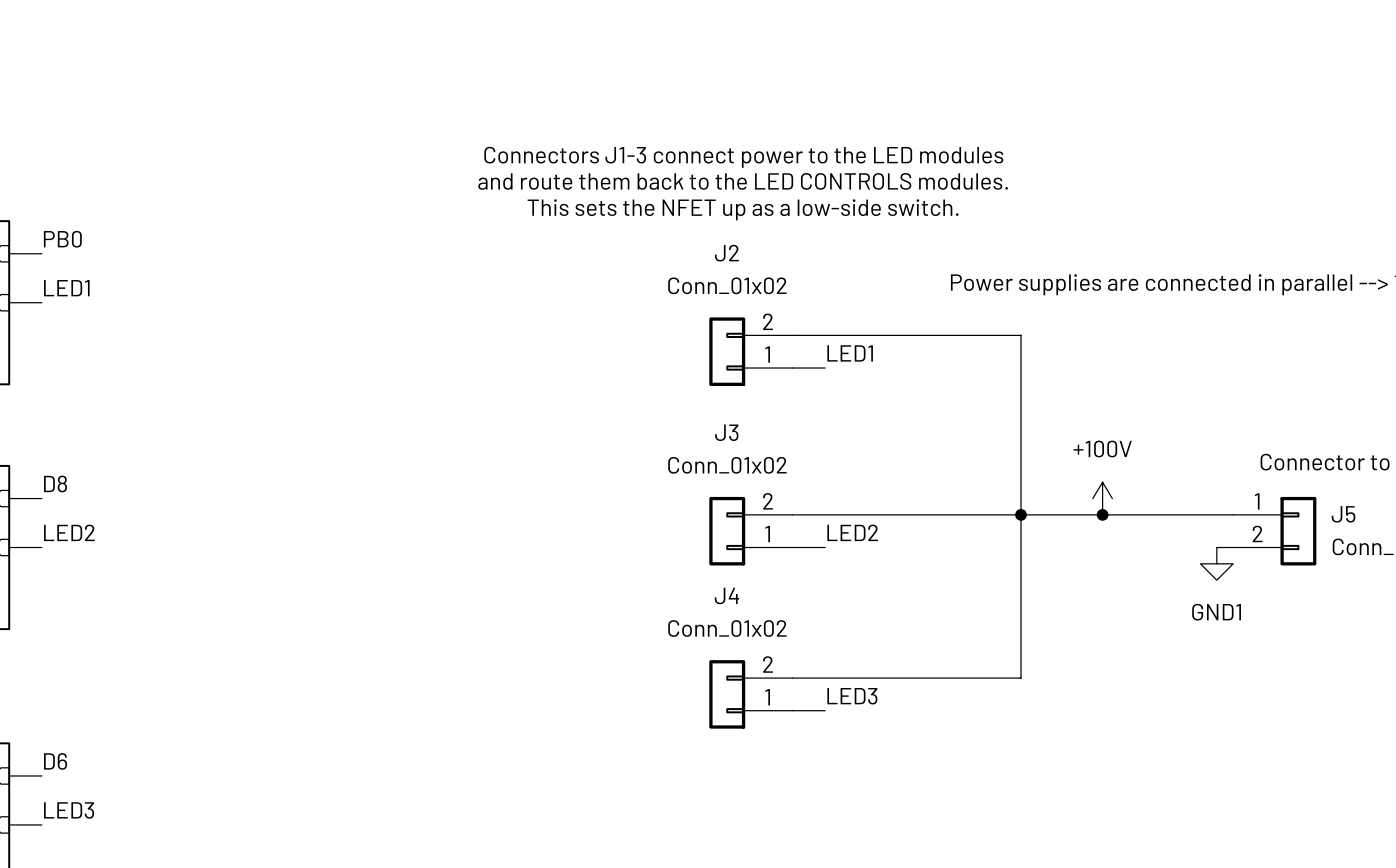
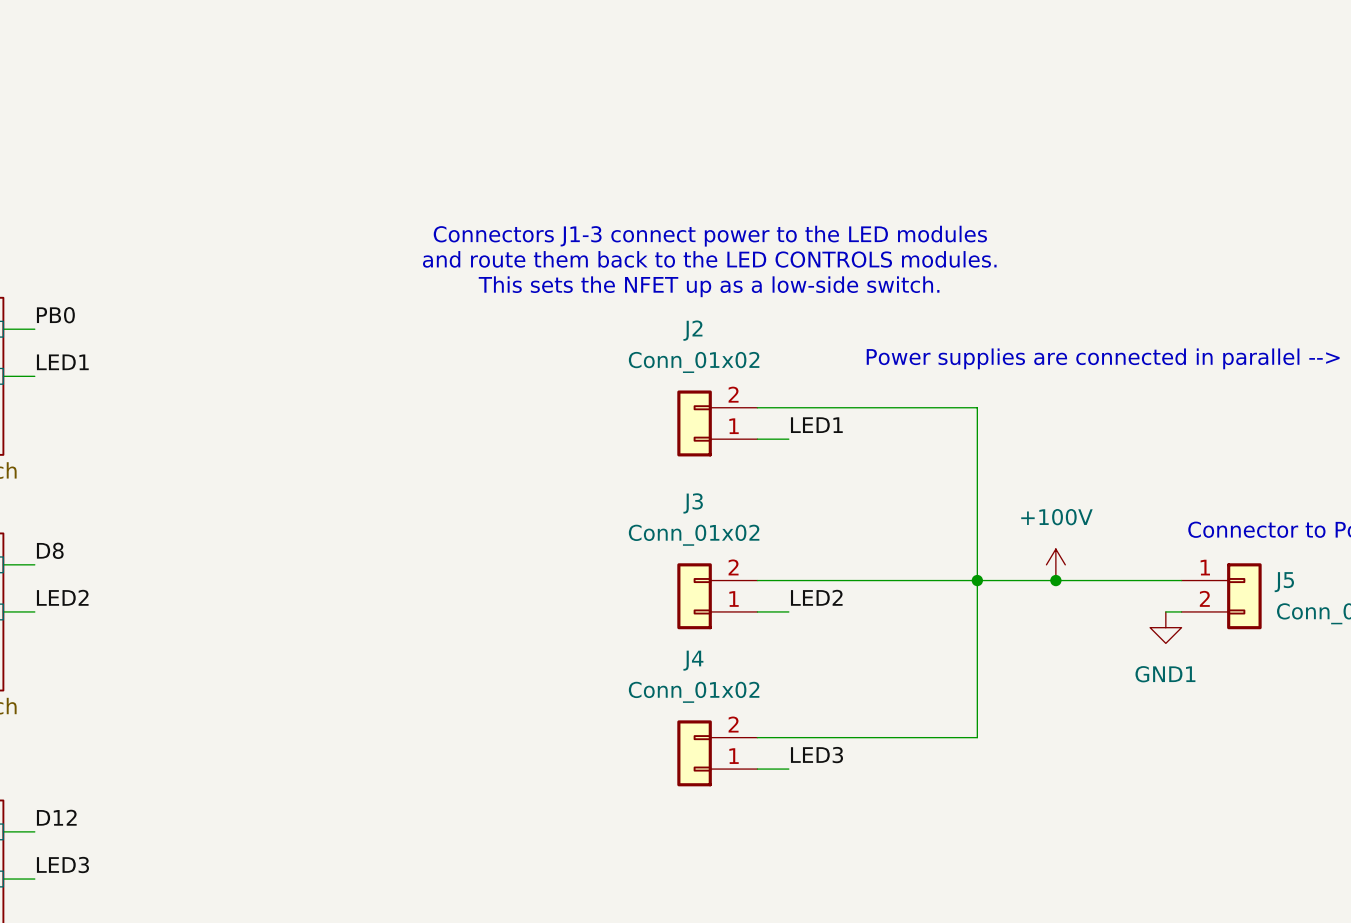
label: D6 (55, 761) -> D12 (56, 817)

